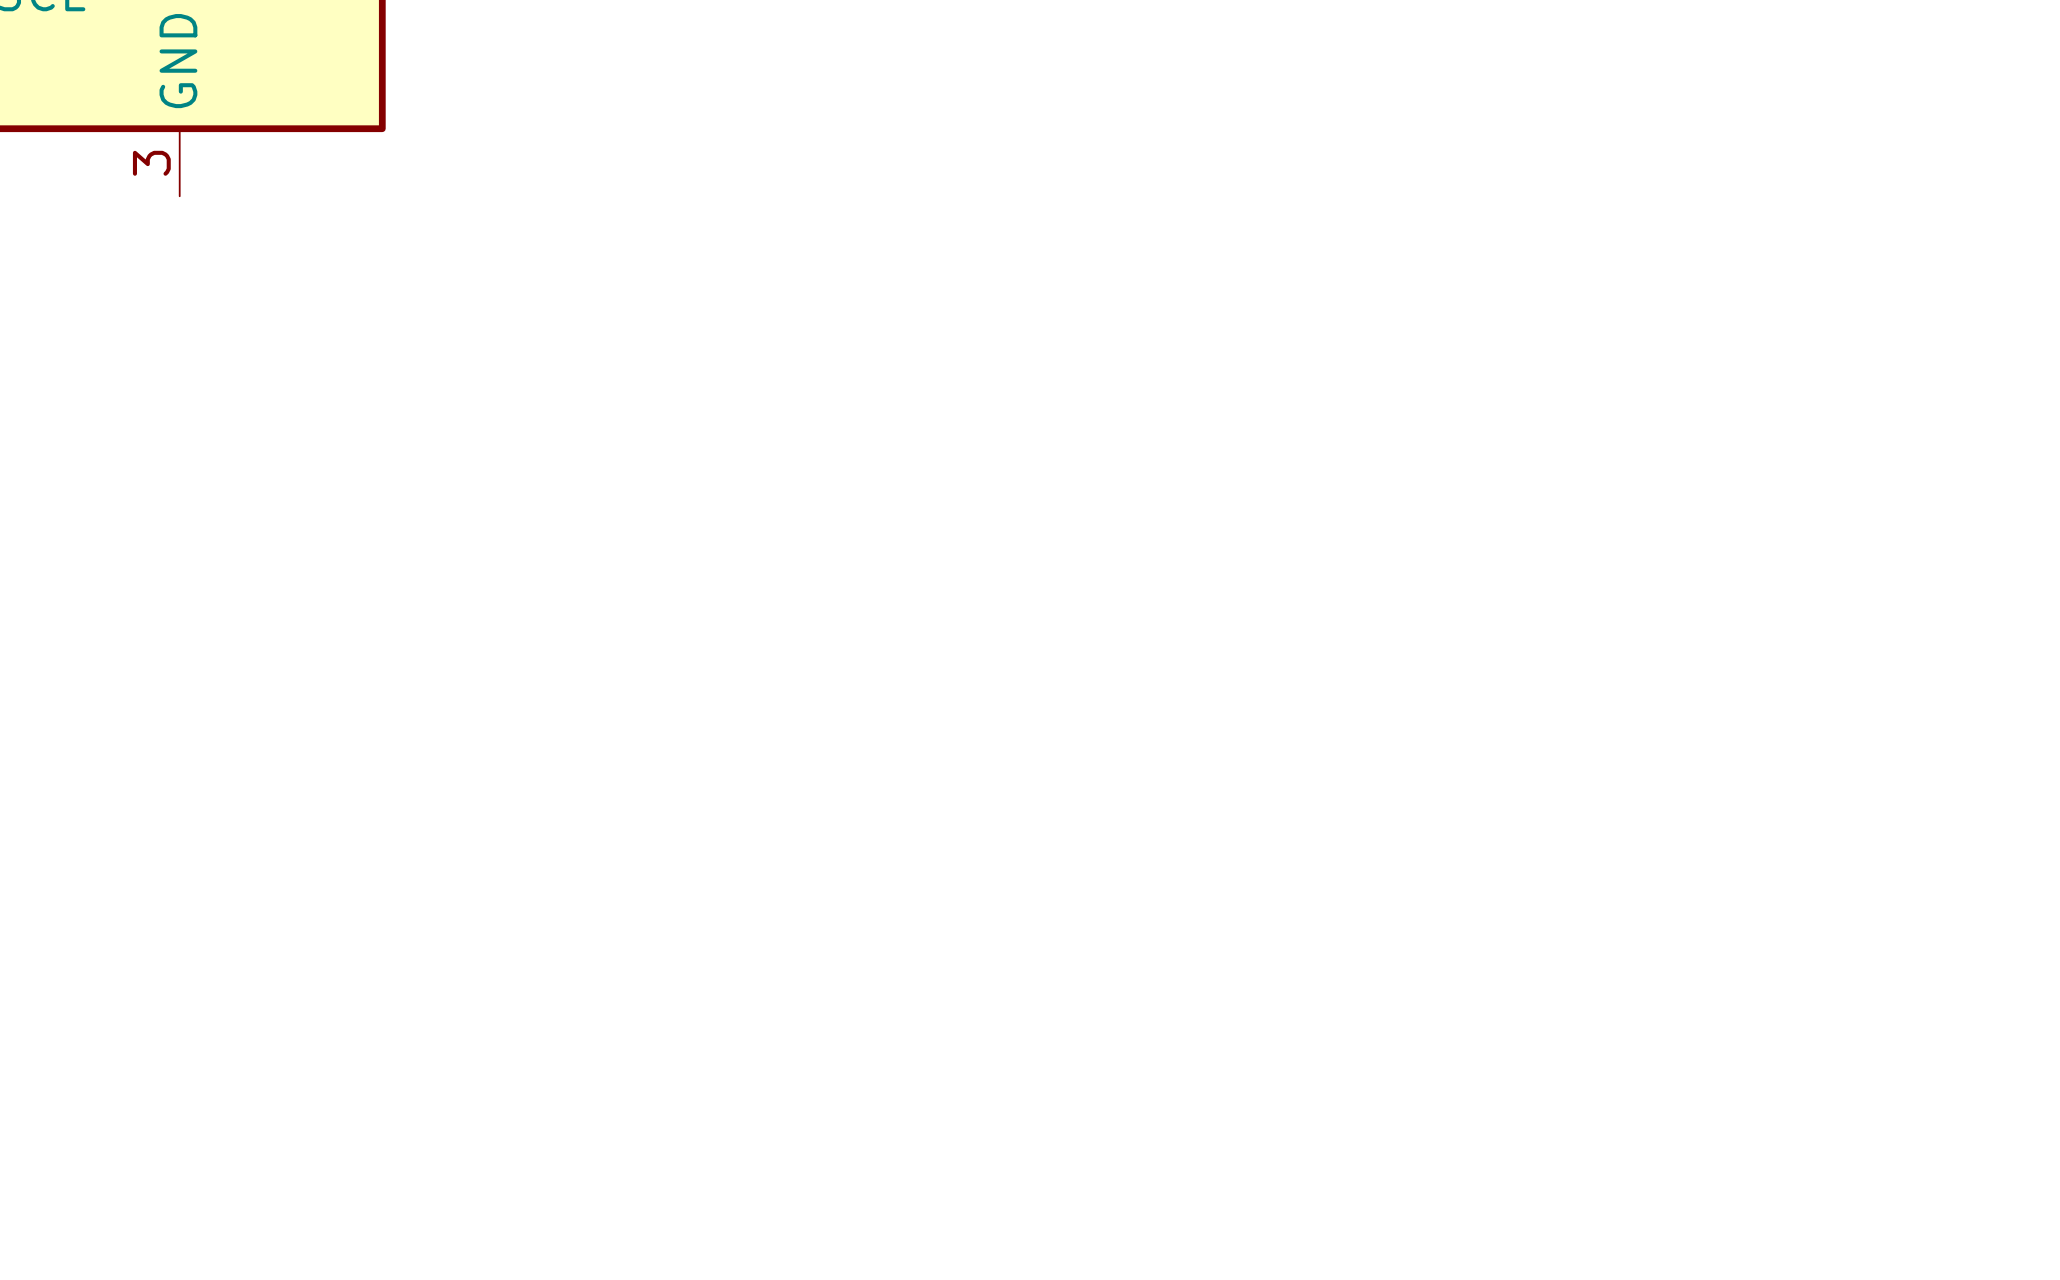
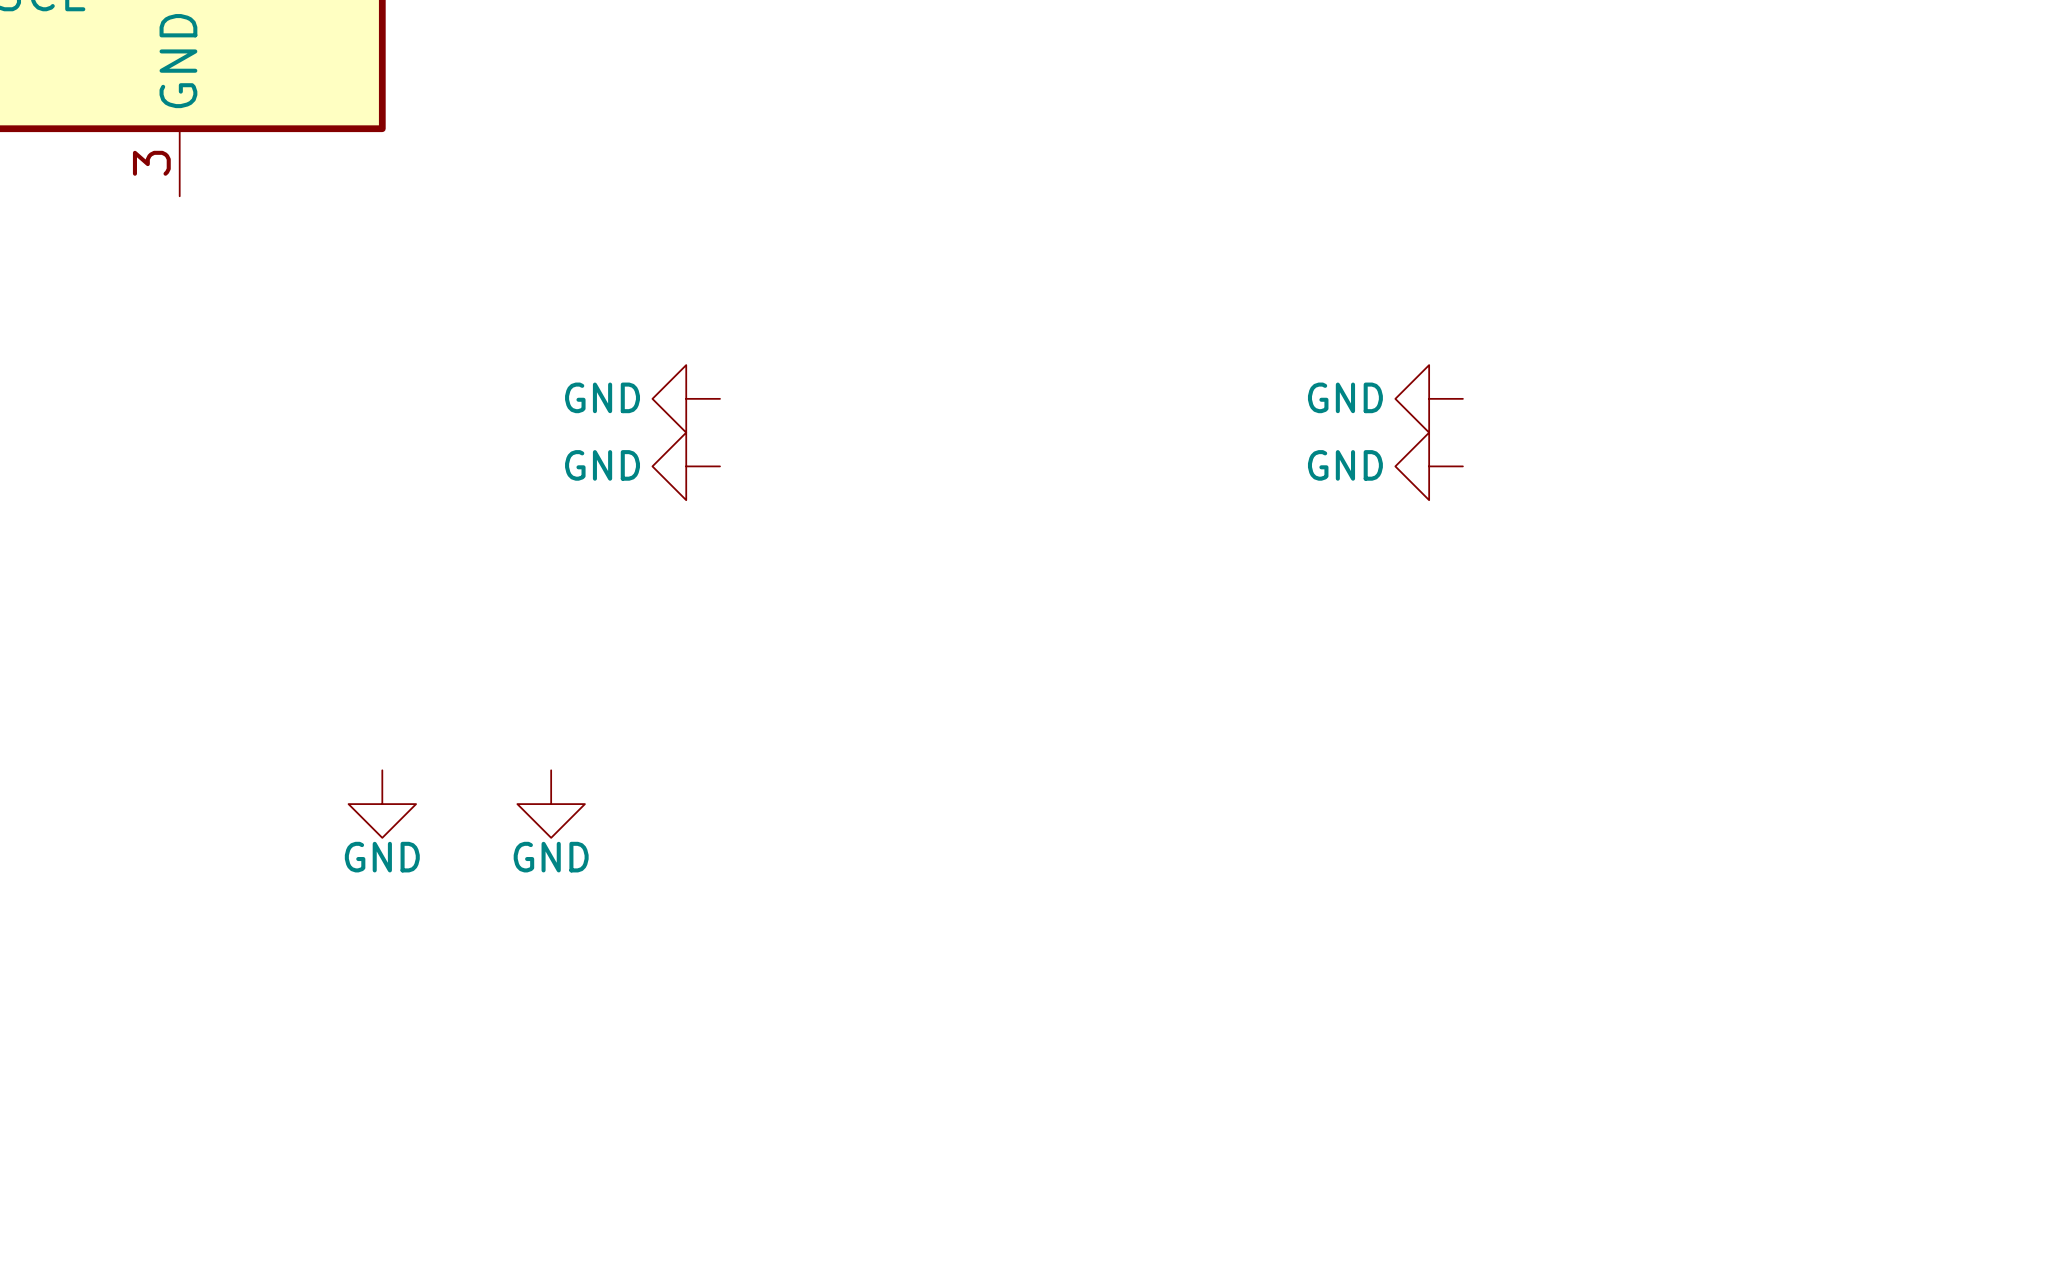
power symbol: none -> GND (686, 398)
power symbol: none -> GND (1429, 398)
power symbol: none -> GND (686, 466)
power symbol: none -> GND (1429, 466)
power symbol: none -> GND (382, 804)
power symbol: none -> GND (551, 804)

